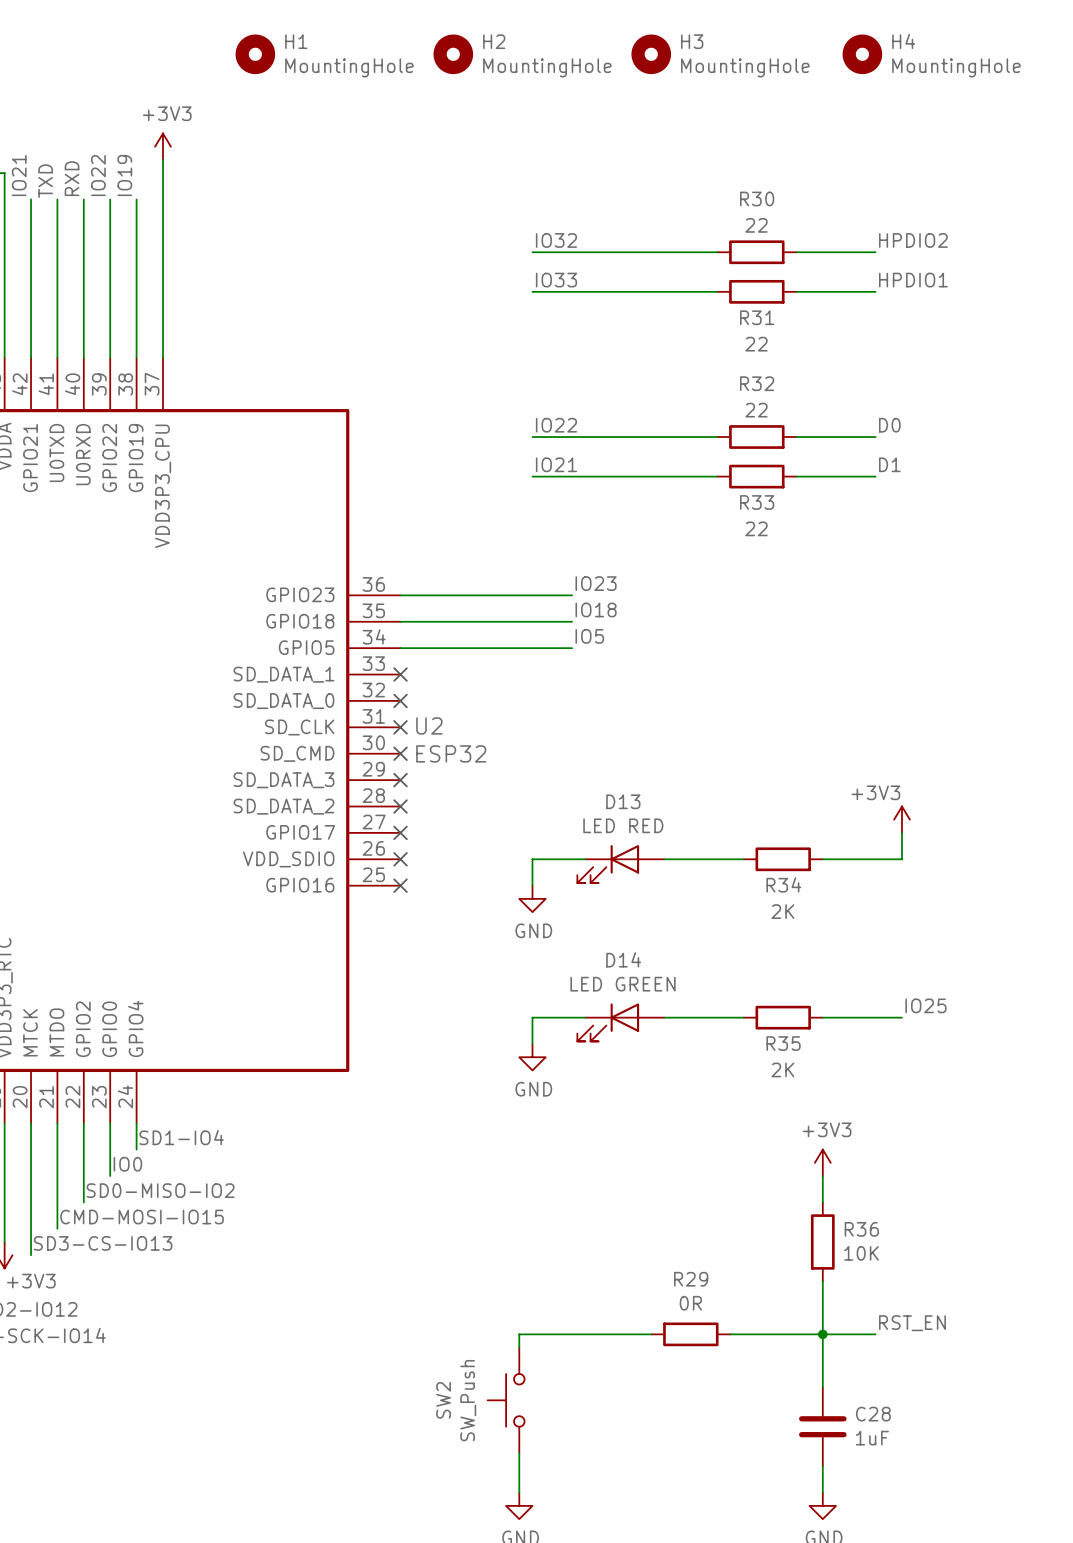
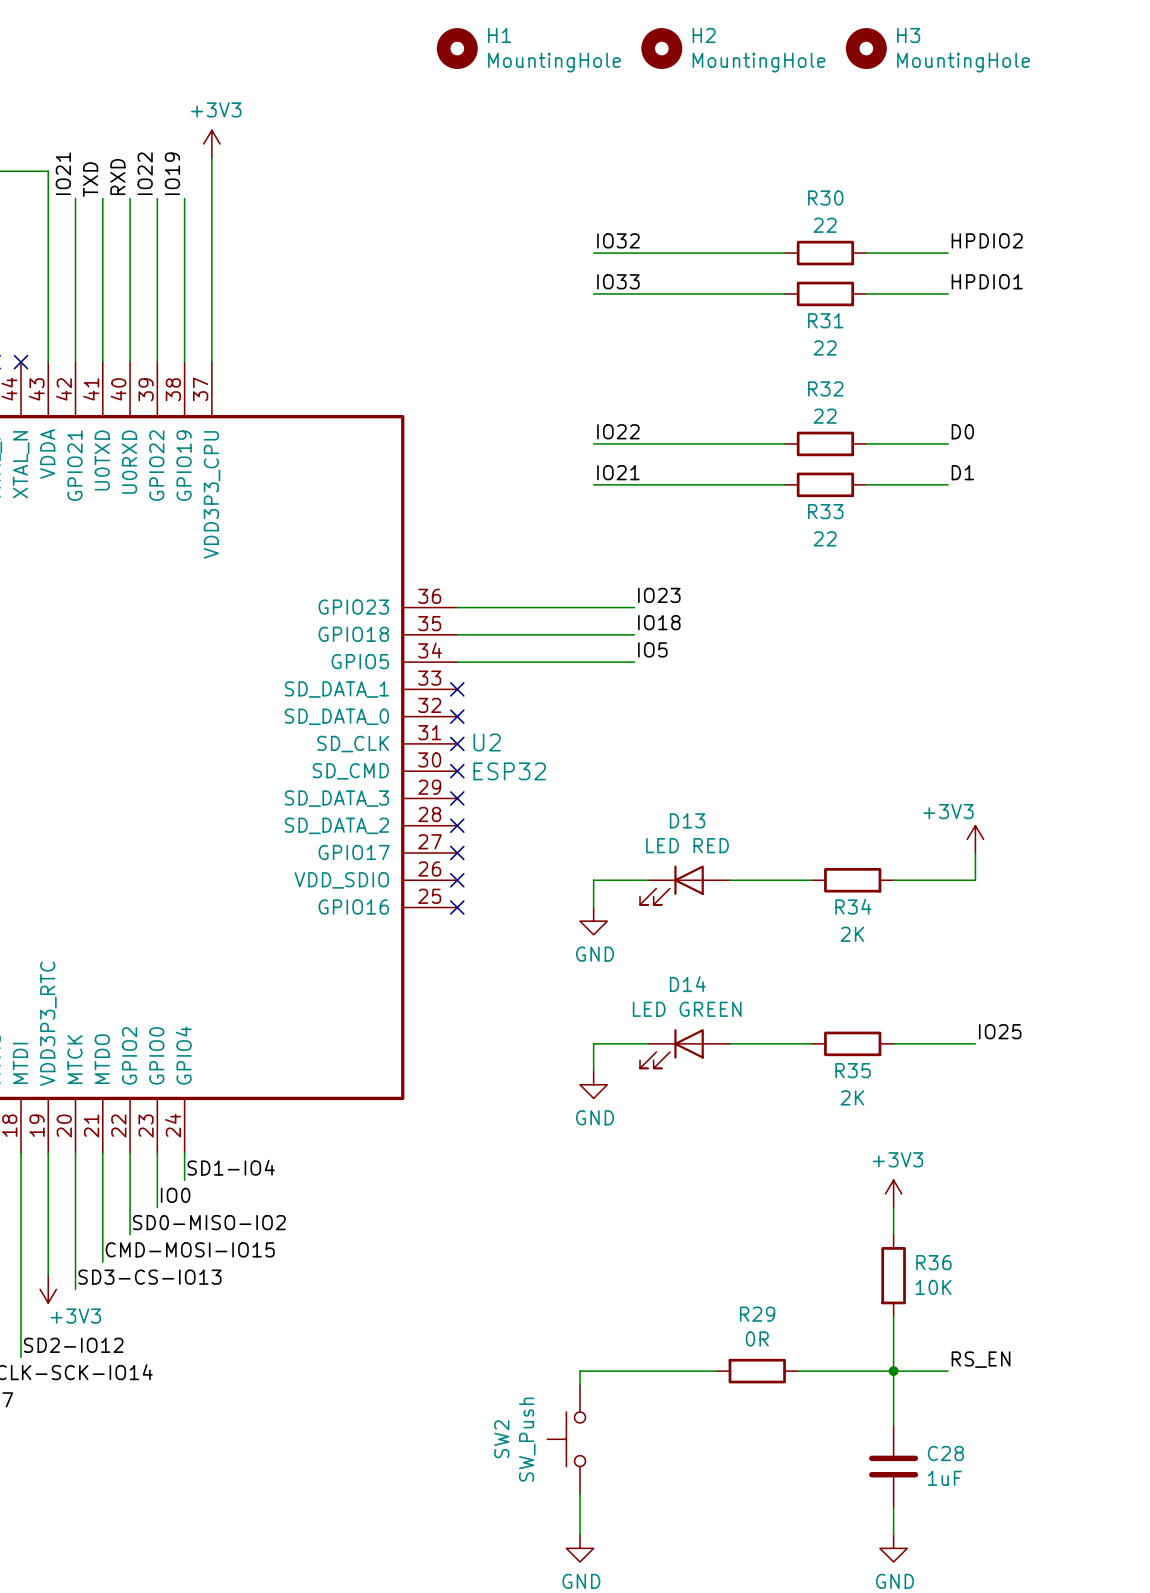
H1 position: (255, 54) -> (457, 48)
H2 position: (453, 54) -> (661, 48)
H3 position: (651, 54) -> (866, 48)
H4: MountingHole (862, 54) -> none
label: RST_EN (912, 1323) -> RS_EN (981, 1359)

